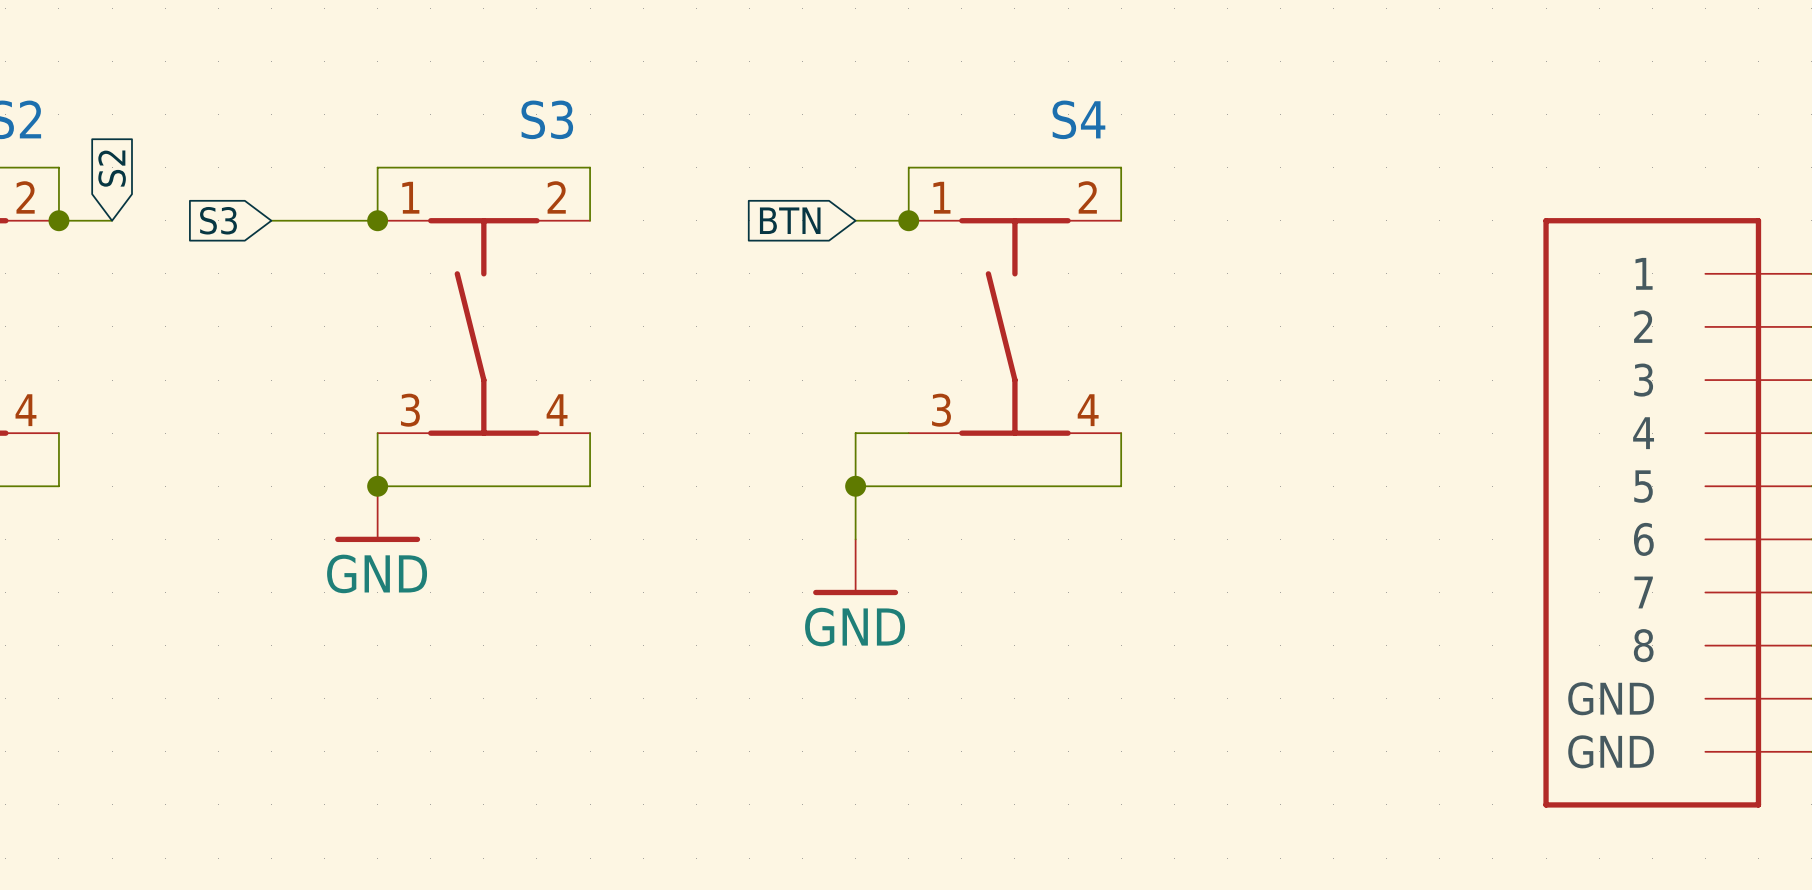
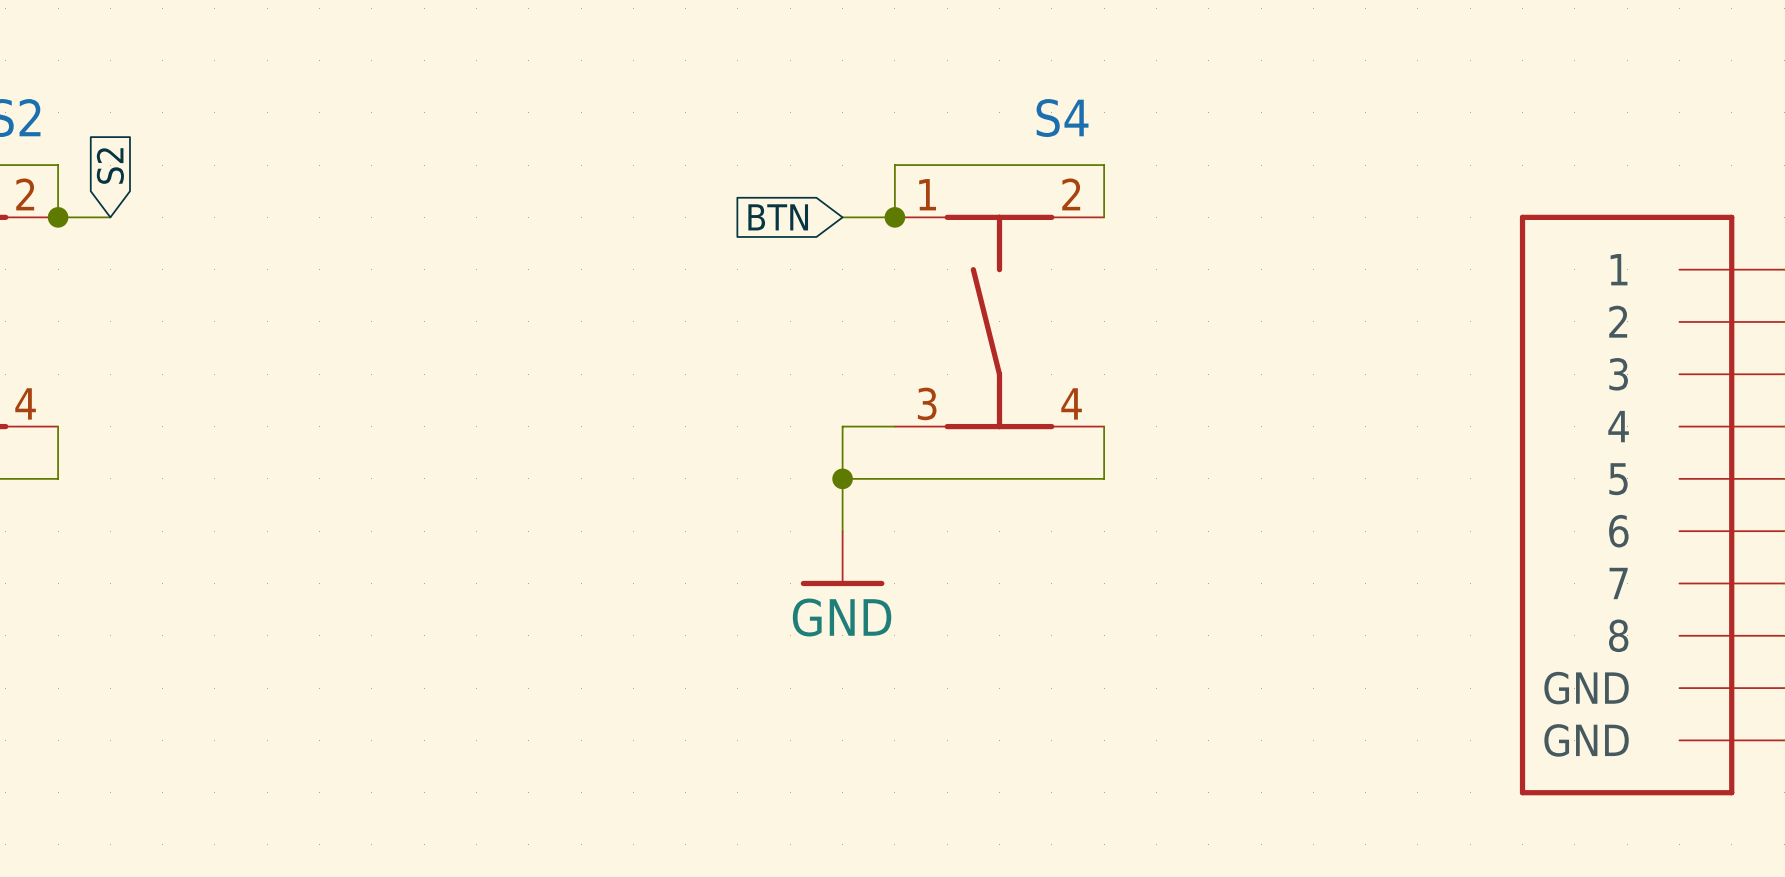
global label: S3 (218, 220) -> none
wire: (271, 220) (377, 220) (377, 167) (590, 167) (590, 220) -> none
junction: (377, 220) -> none
S3: (483, 326) -> none
wire: (377, 433) (377, 486) (590, 486) (590, 433) -> none
junction: (377, 486) -> none
power symbol: GND (377, 514) -> none

